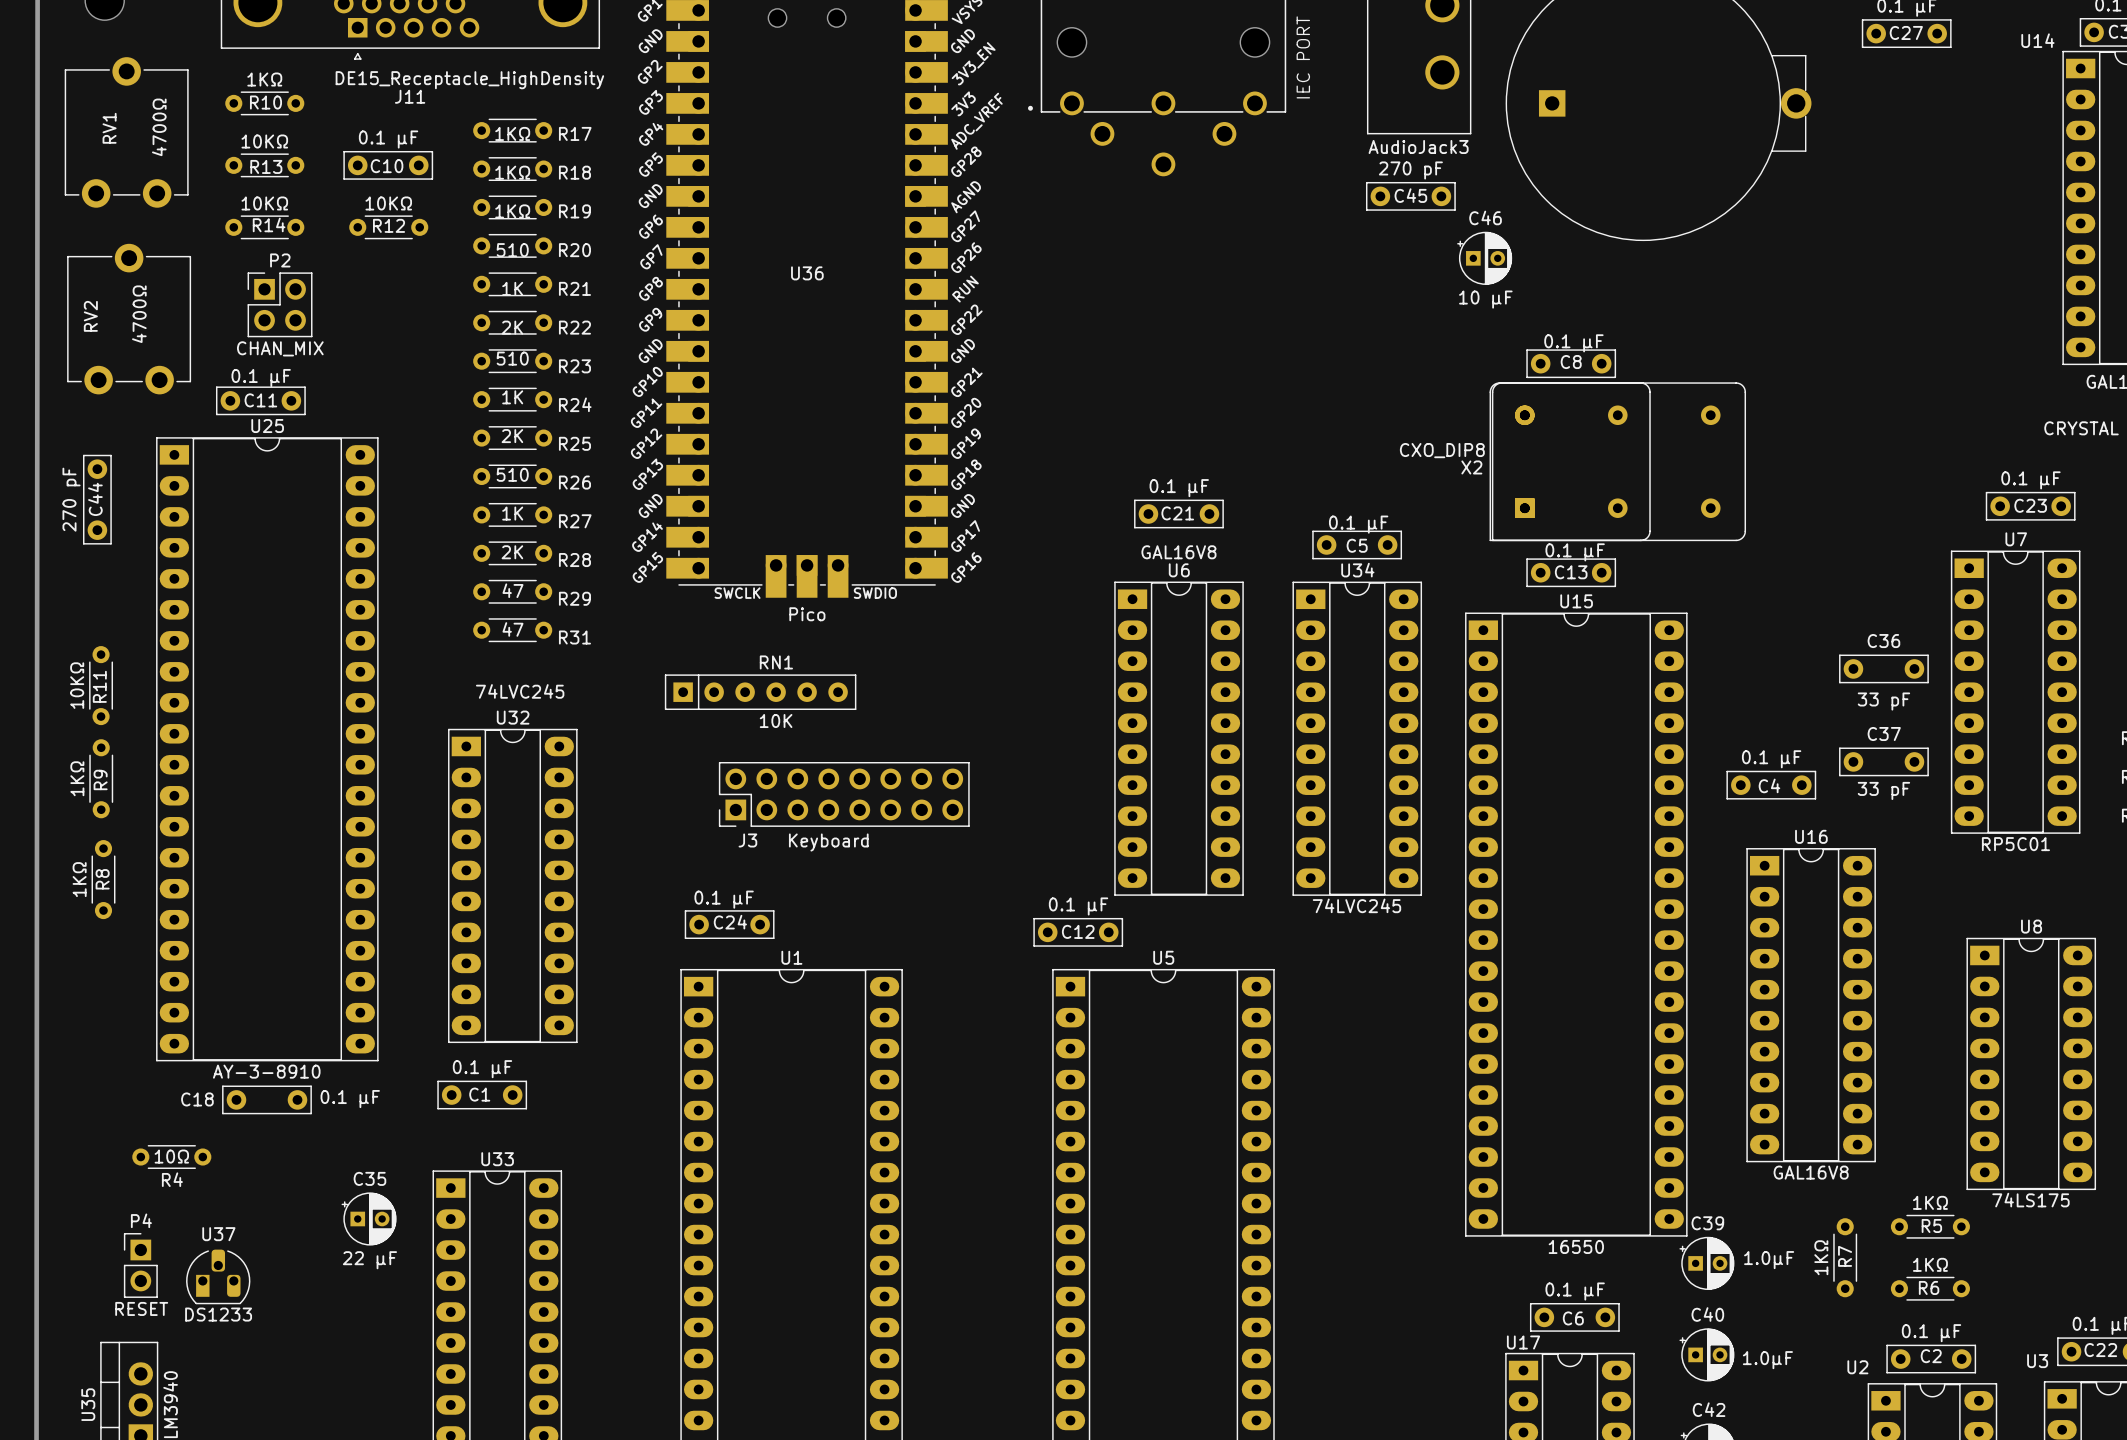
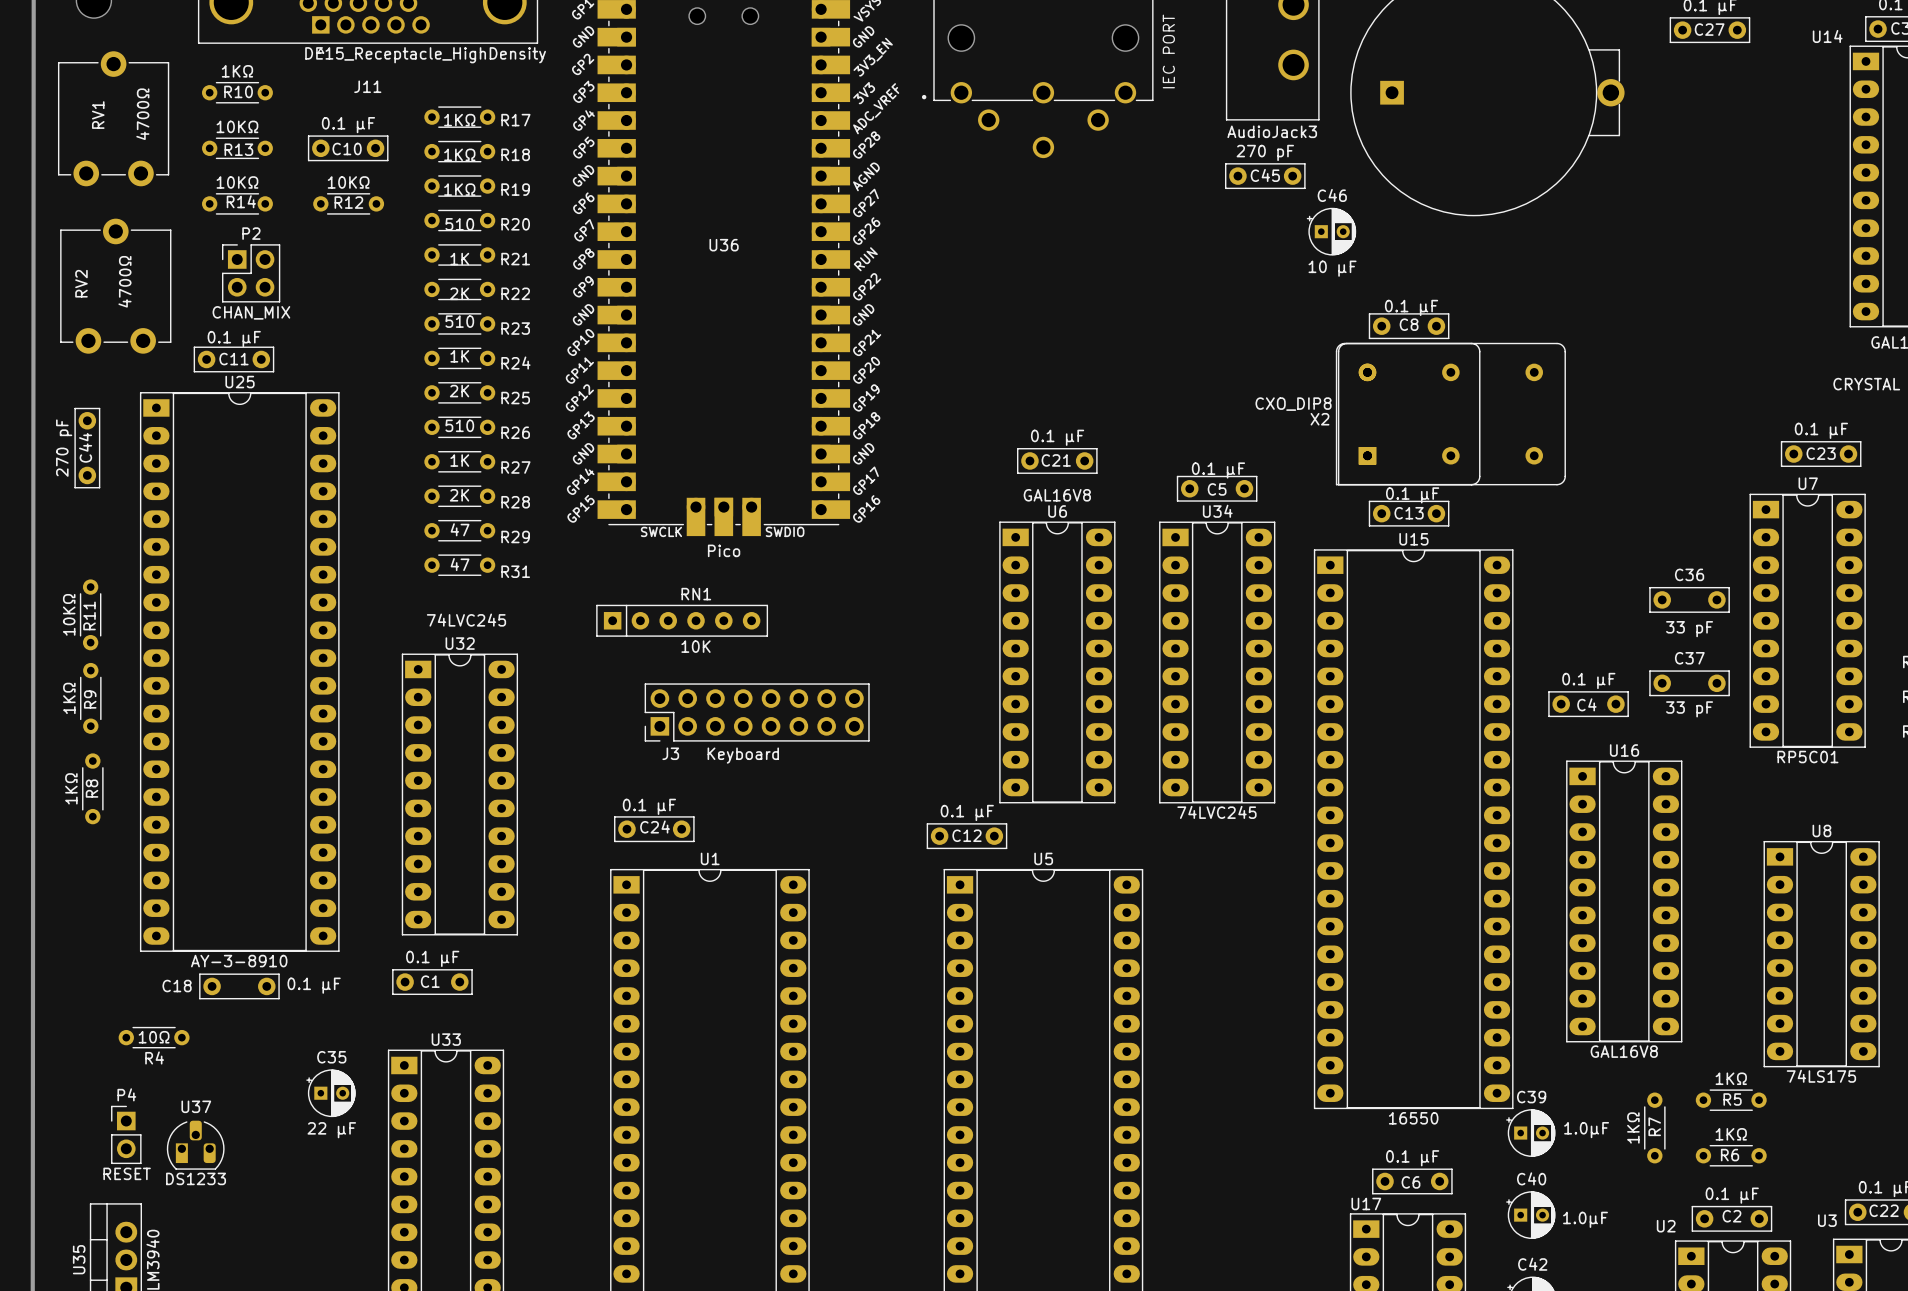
J11 value position: DE15_Receptacle_HighDensity (469, 80) -> DE15_Receptacle_HighDensity (425, 55)

